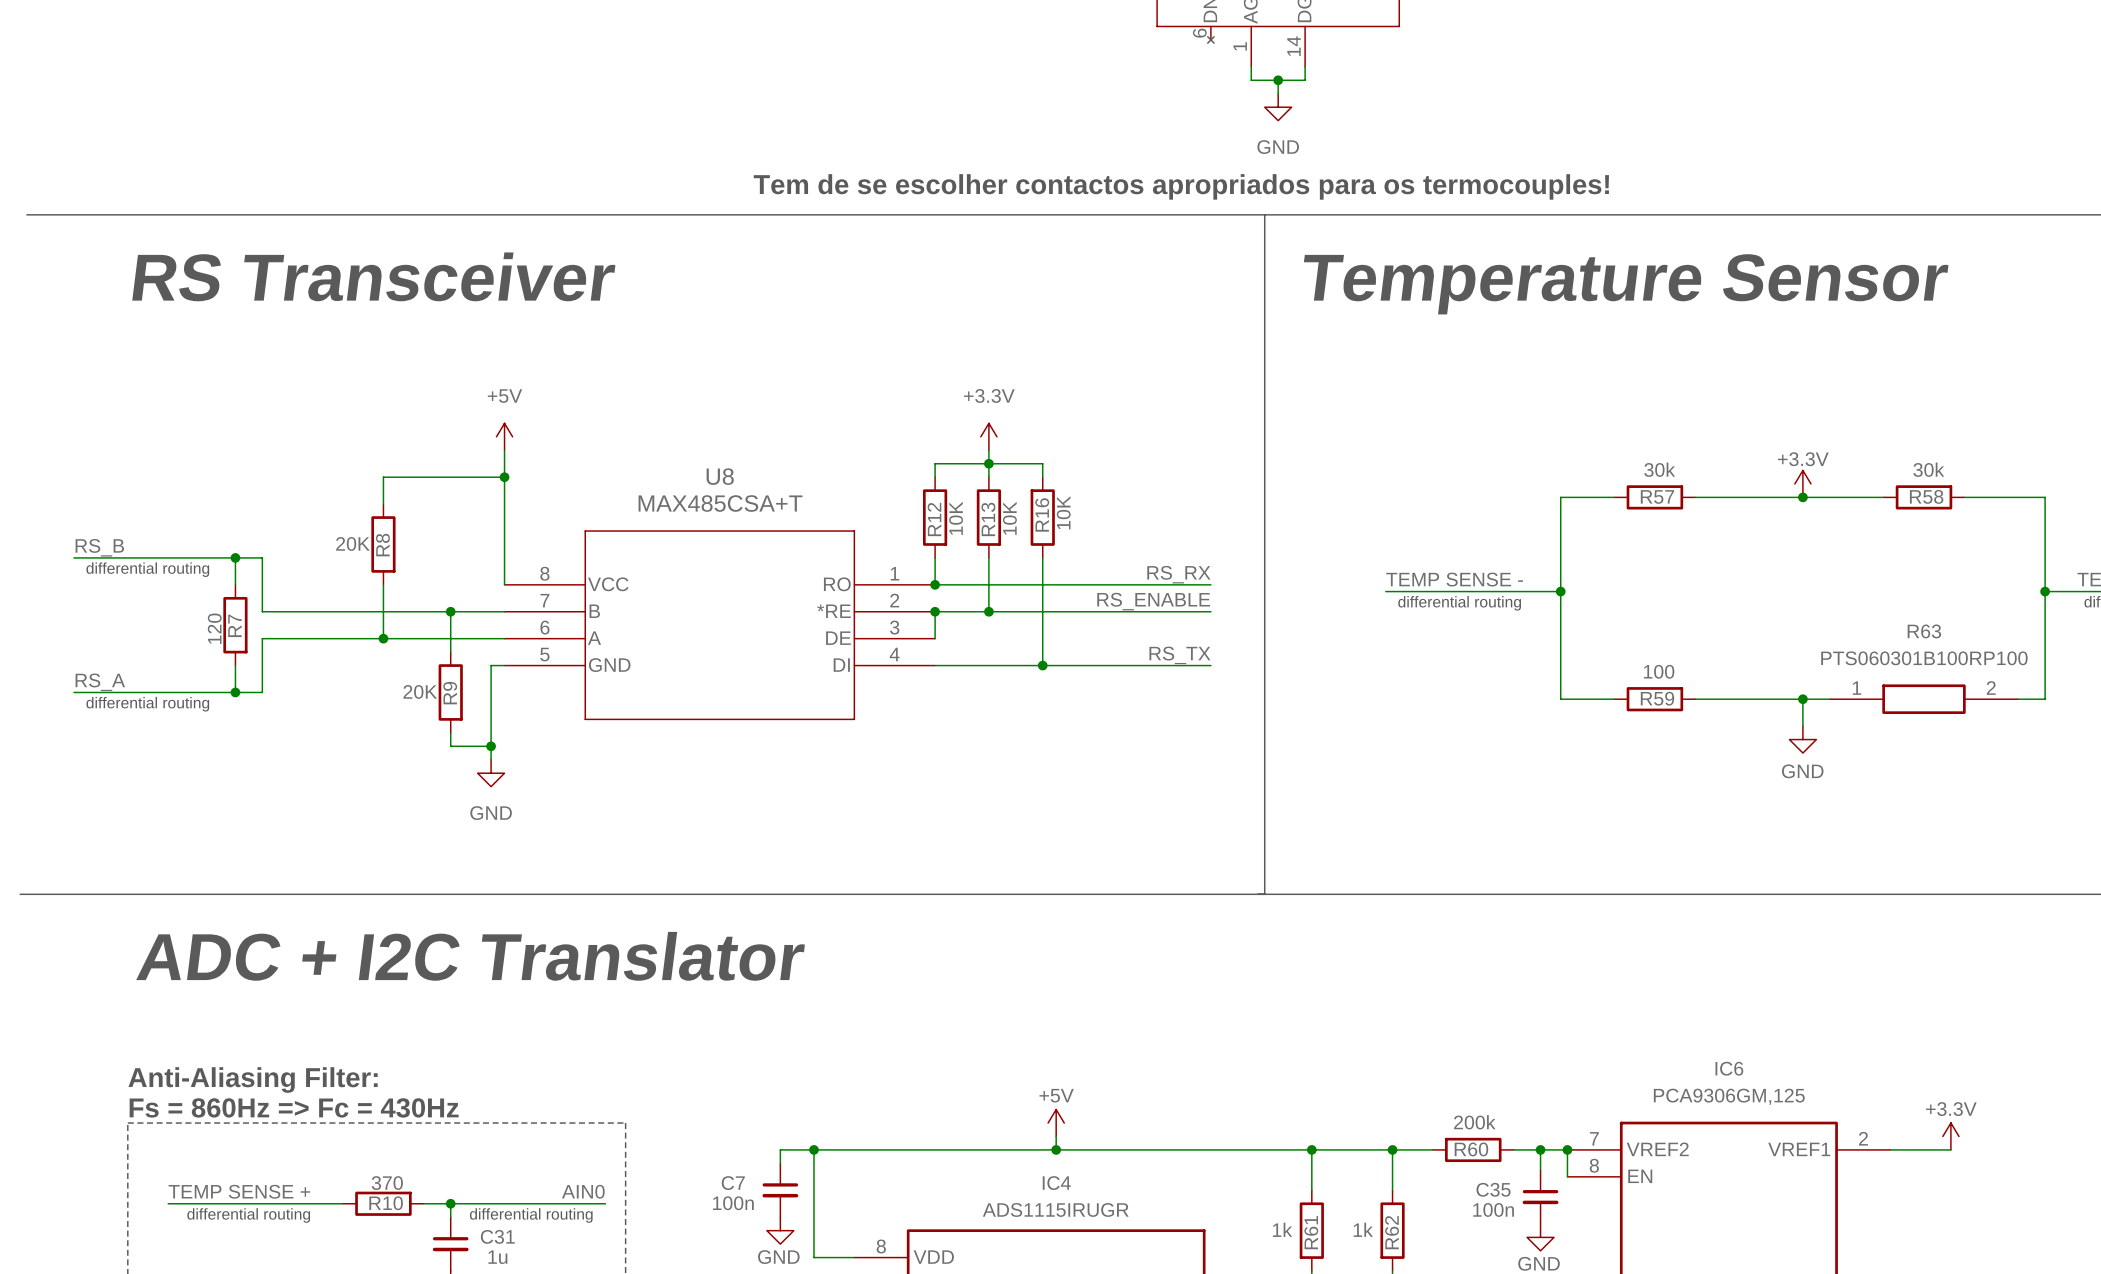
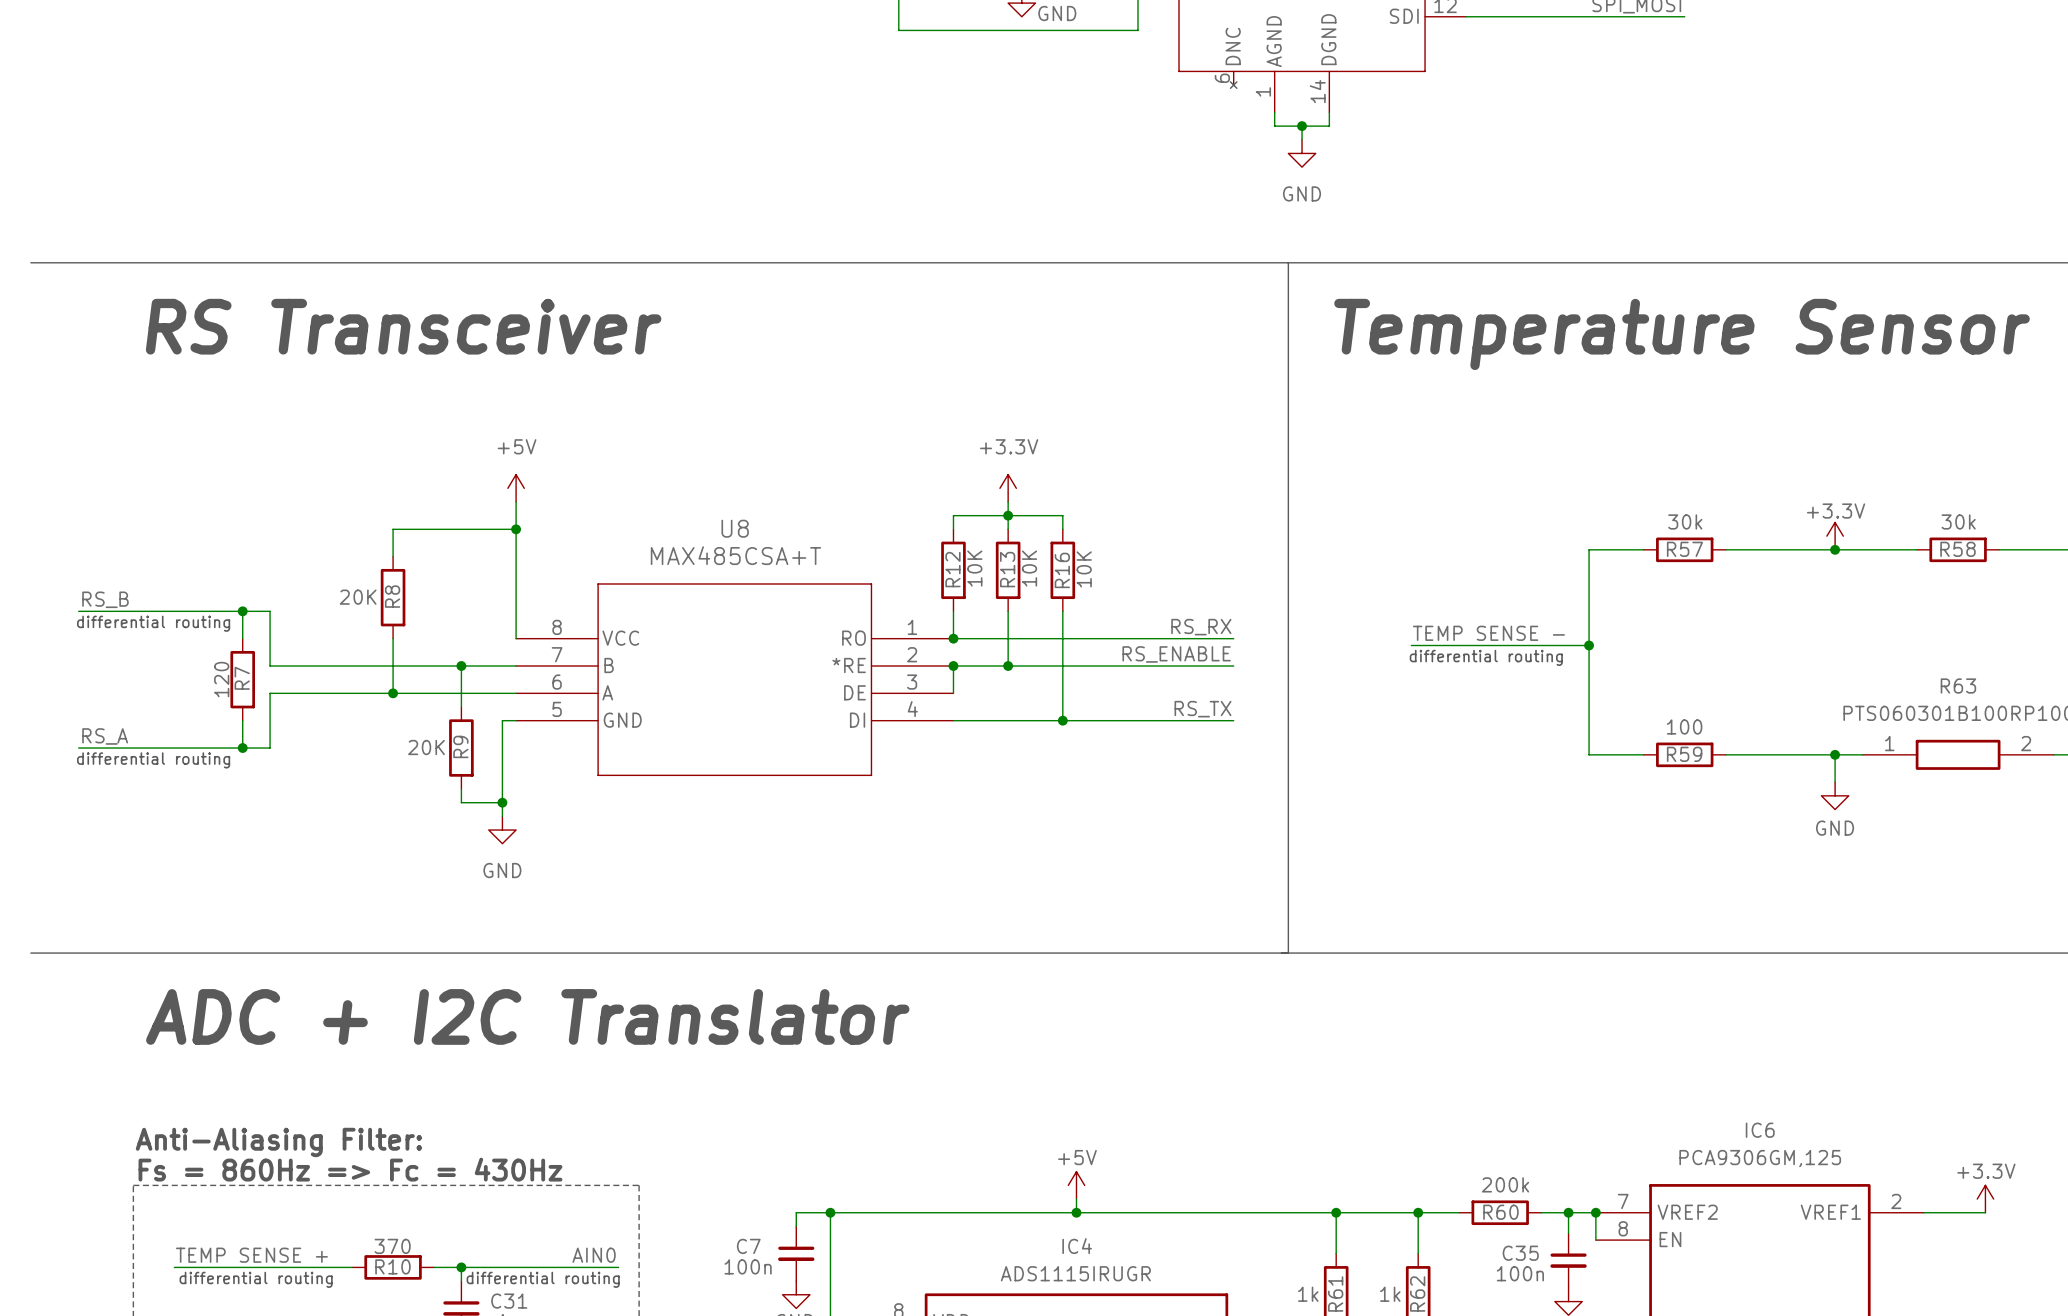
text: Tem de se escolher contactos apropriados para os termocouples! (1181, 186) -> none
line: (20, 894) (26, 894) -> none

